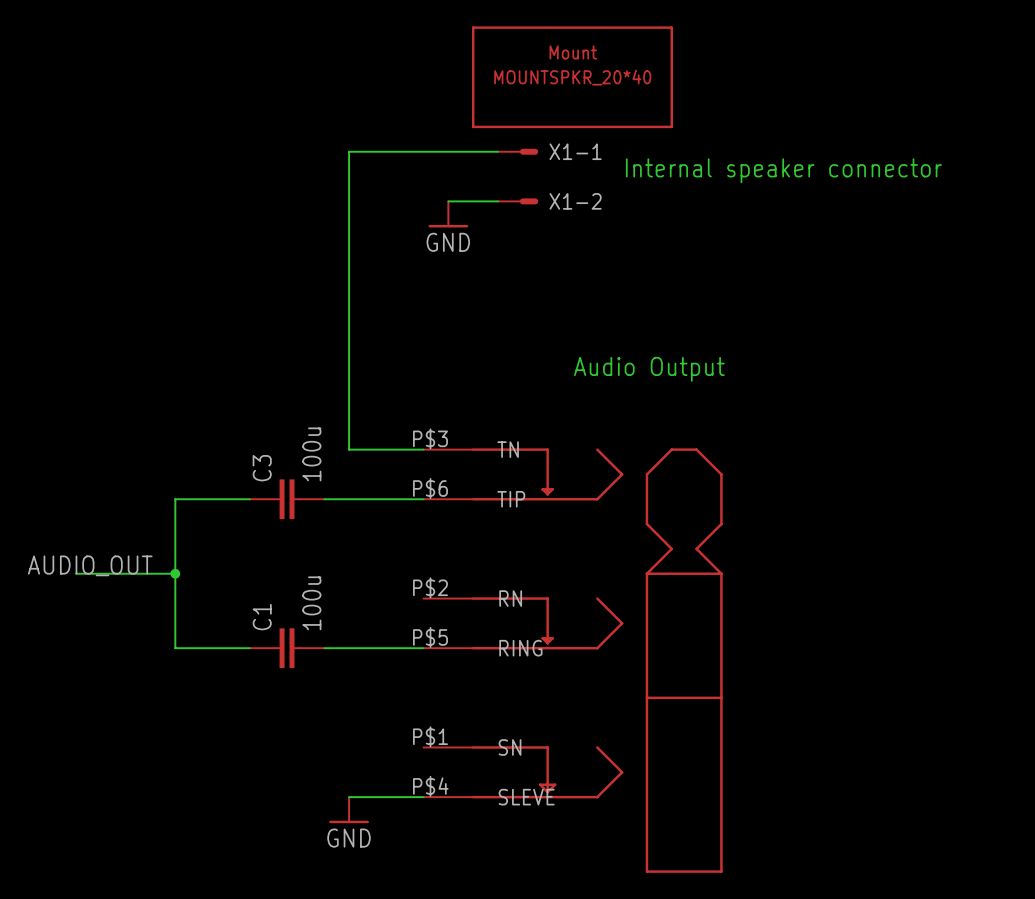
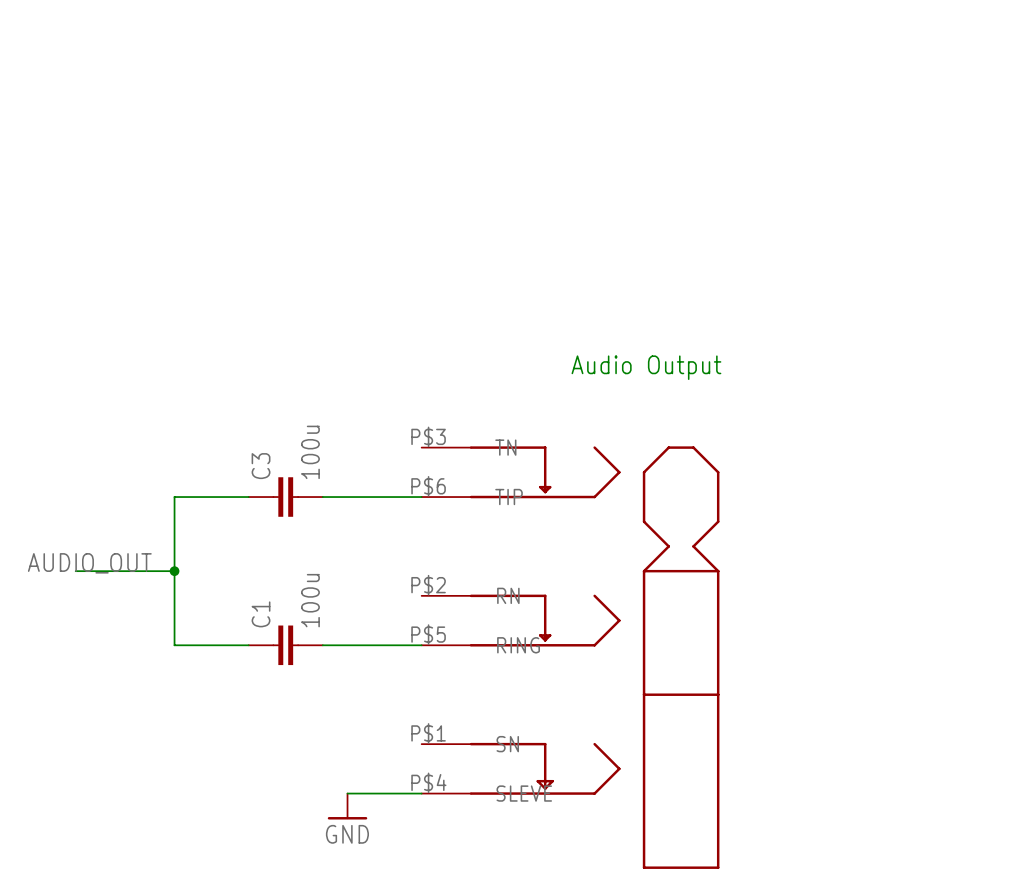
part: MOUNTSPKR_20*40 (572, 77) -> none
wire: (498, 151) (349, 151) (349, 449) (423, 449) -> none
X1-1: (518, 151) -> none
text: Internal speaker connector (783, 170) -> none
wire: (448, 201) (498, 201) -> none
X1-2: (518, 201) -> none
power symbol: GND (448, 214) -> none

